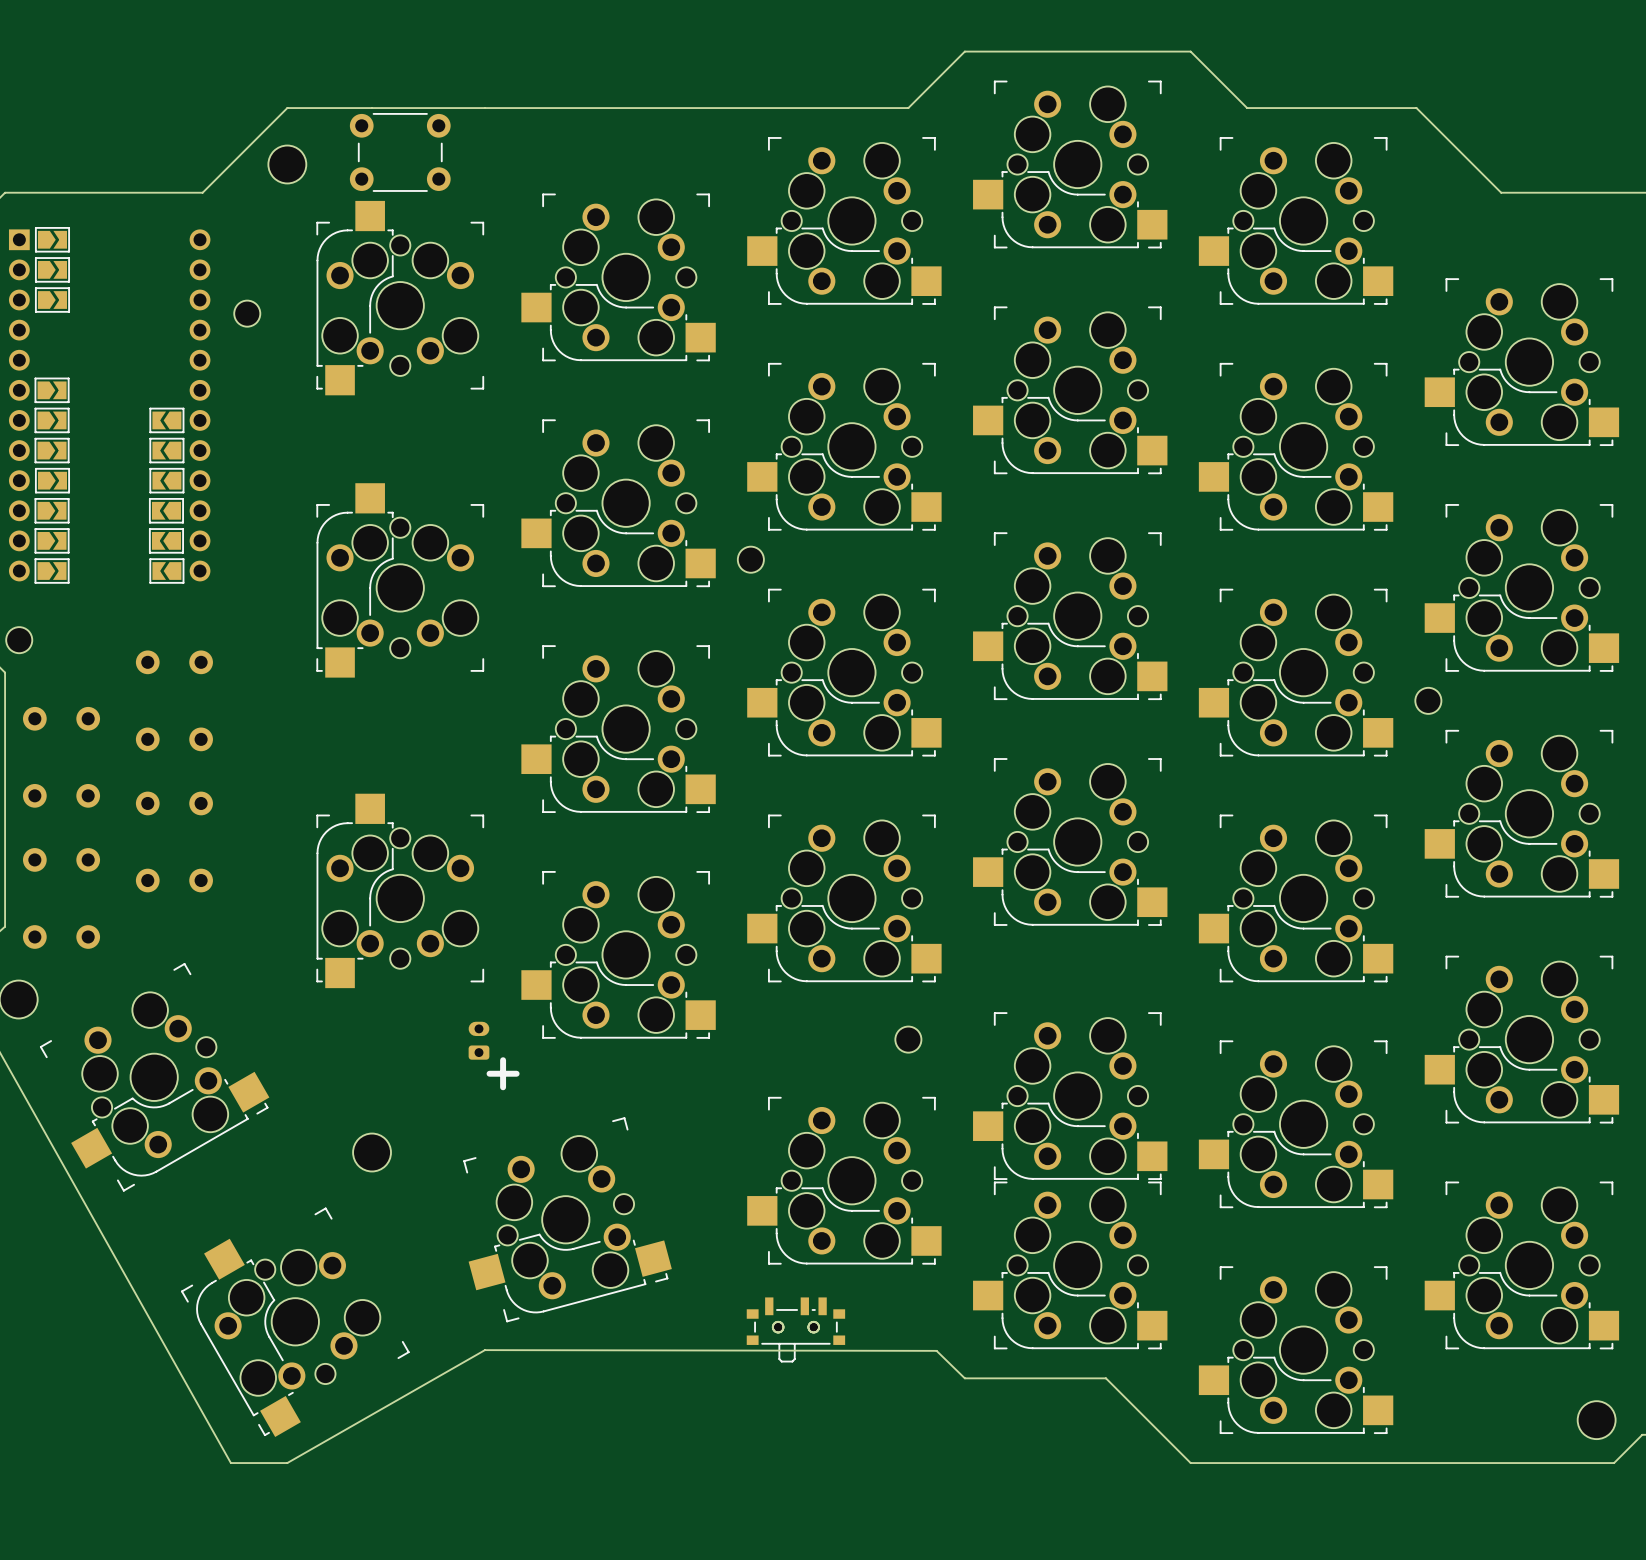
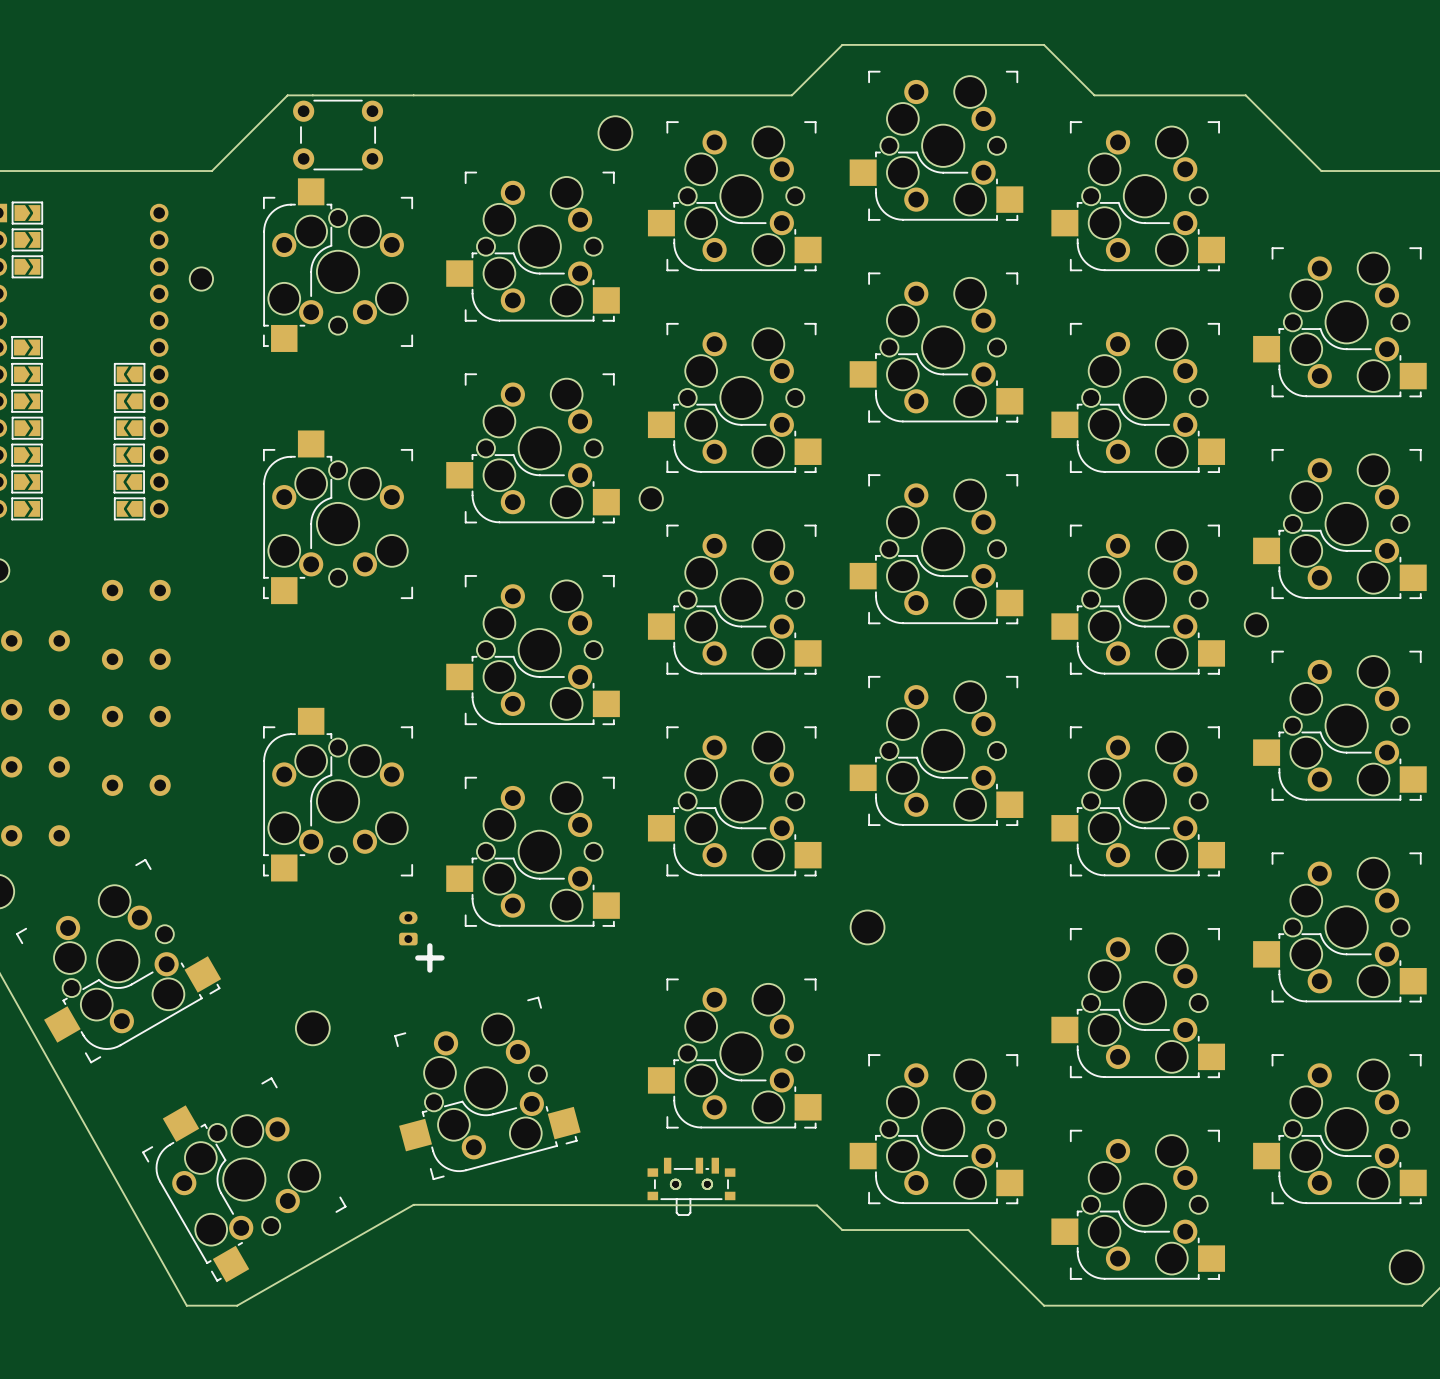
board edge: (343, 108) (287, 108) (202, 192) -> (287, 95) (211, 171) (161, 171)
part: none -> (615, 133)
part: (287, 164) -> none
part: (908, 1039) -> none
part: none -> (867, 927)
part: (1070, 1096) -> none

